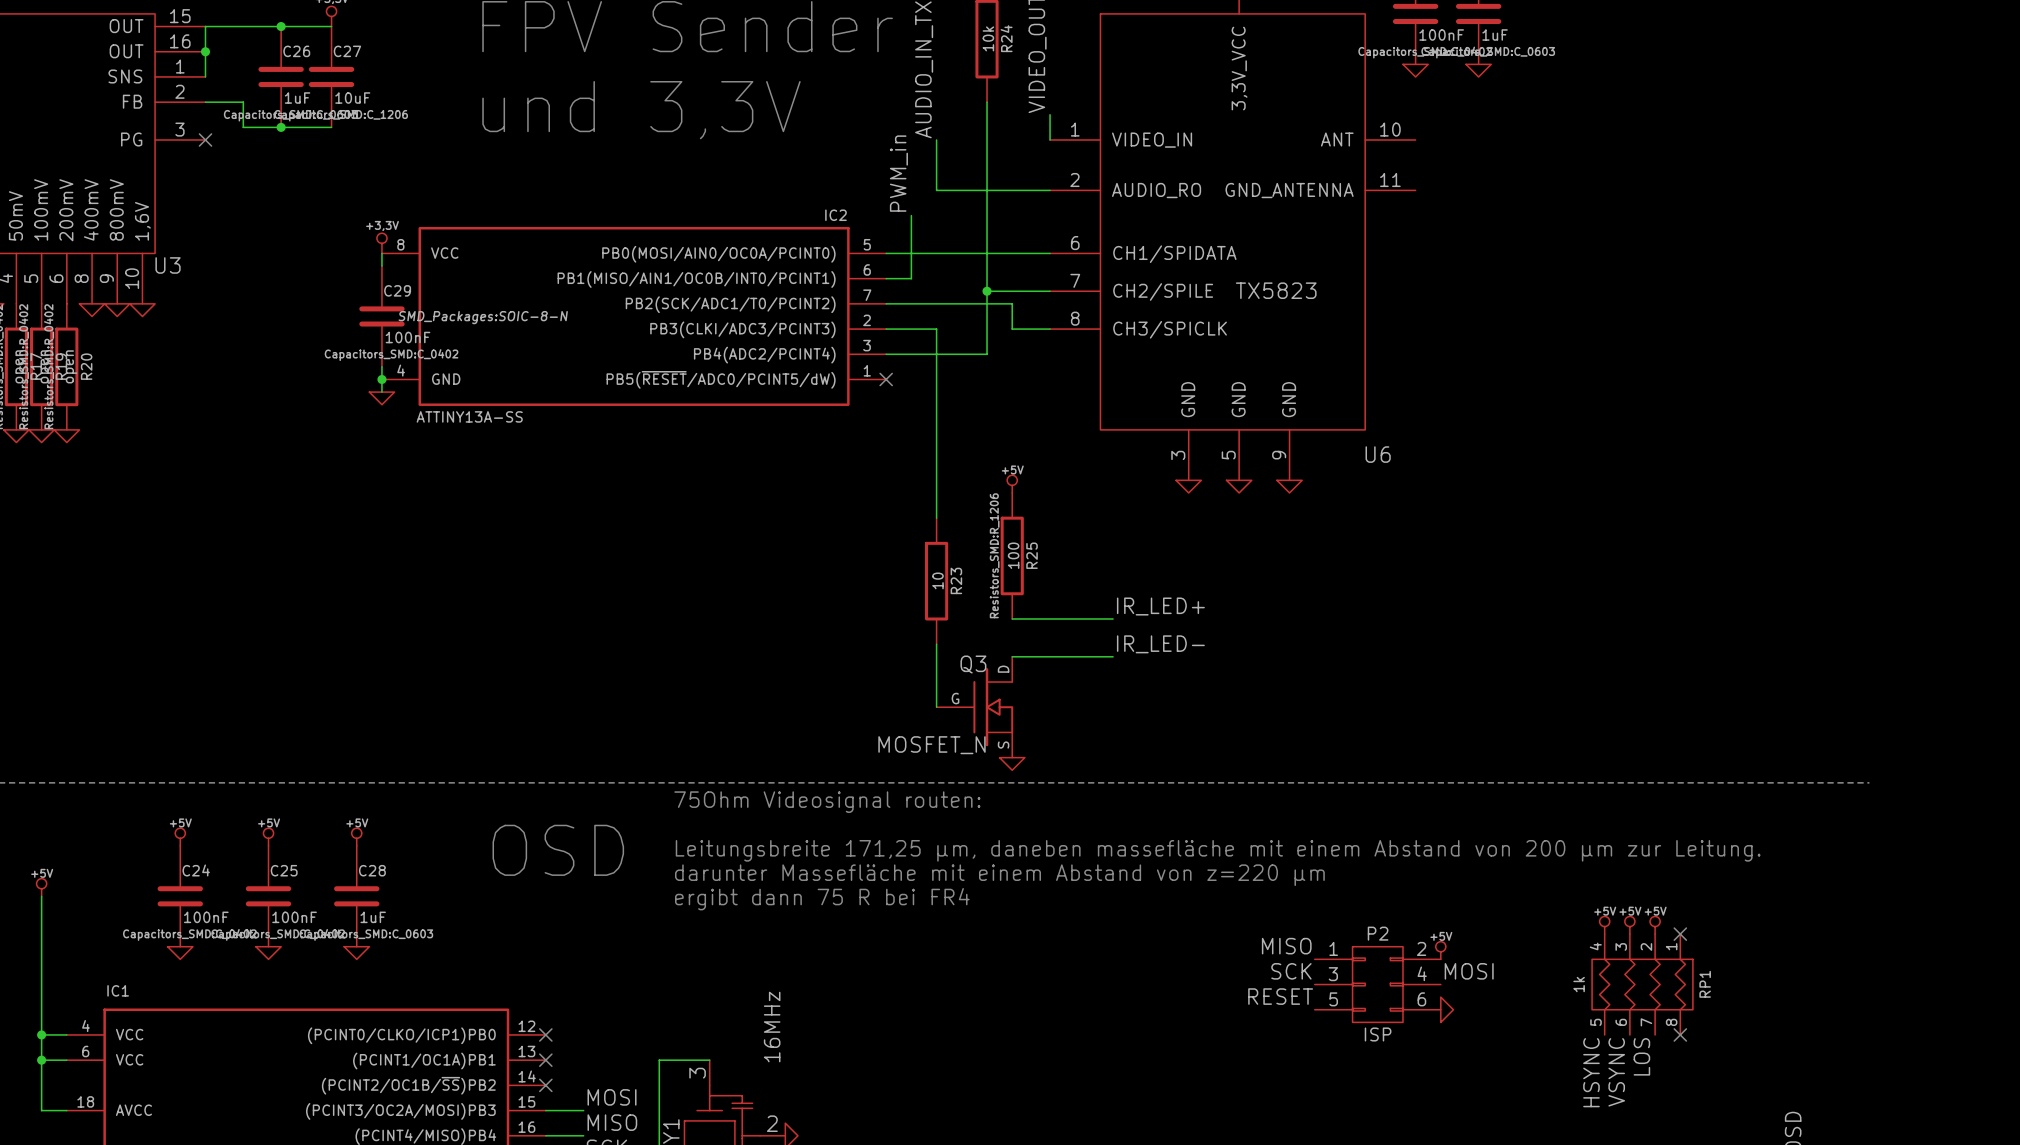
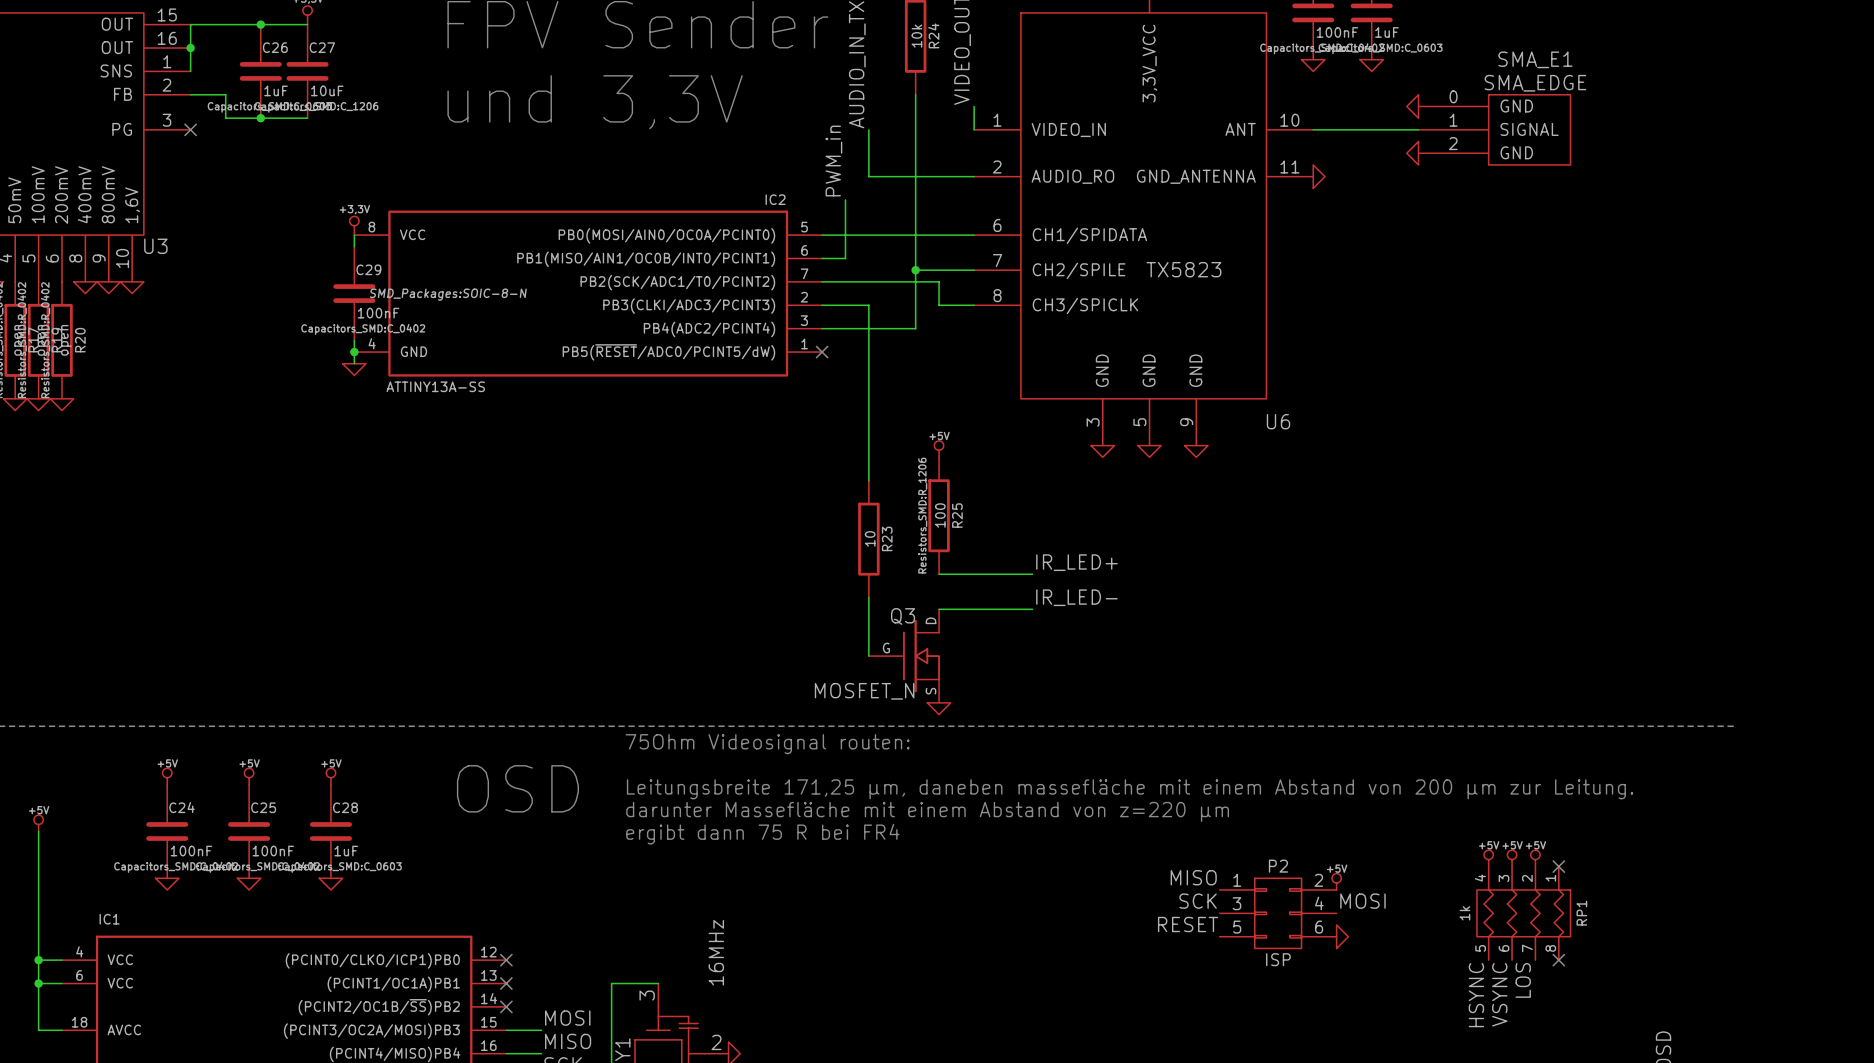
power symbol: none -> (1412, 106)
wire: none -> (1313, 129) (1418, 129)
SMA_E1: none -> SMA_EDGE (1494, 129)
power symbol: none -> (1412, 153)
power symbol: none -> (1319, 176)

